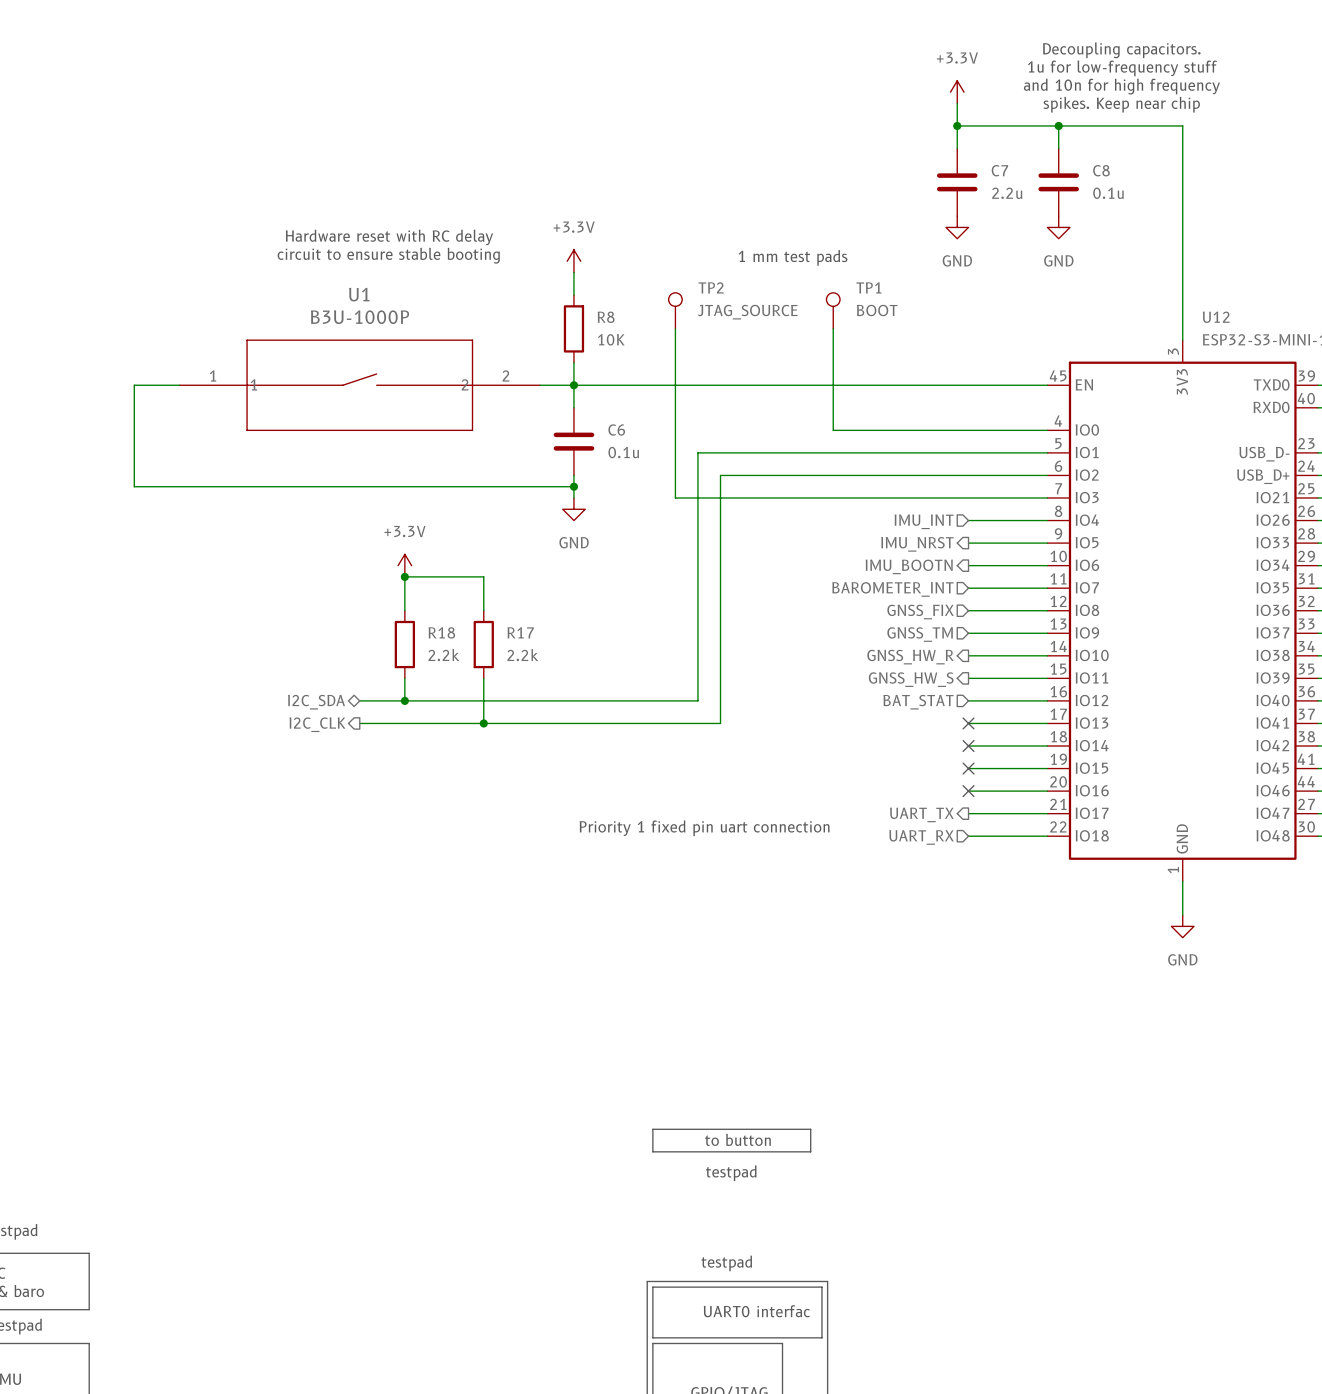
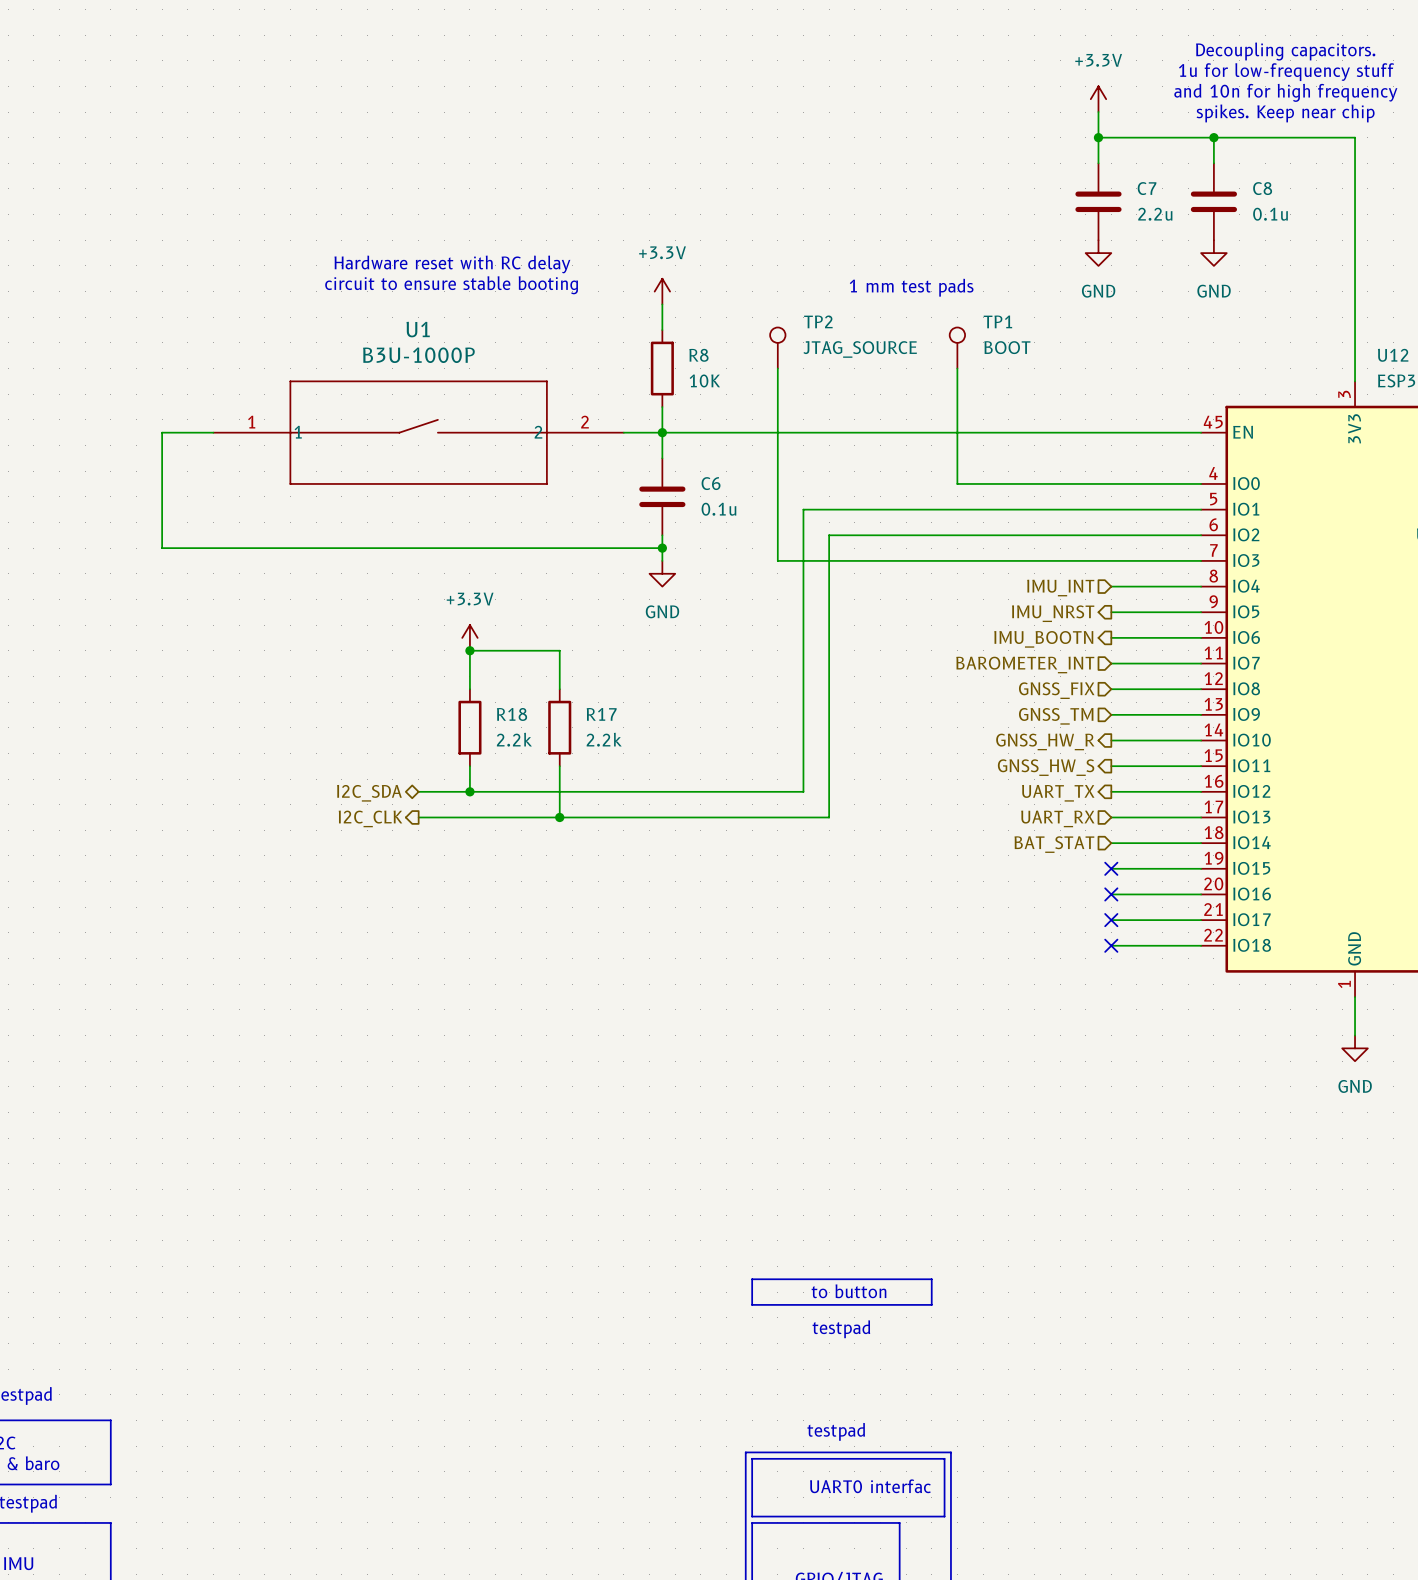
hierarchical label shape: input (918, 702) -> output (1058, 793)
hierarchical label: BAT_STAT (918, 702) -> UART_TX (1058, 793)
no-connect mark: (968, 723) -> none
no-connect mark: (968, 746) -> none
hierarchical label: none -> BAT_STAT (1054, 844)
no-connect mark: none -> (1111, 920)
hierarchical label: UART_TX (921, 814) -> none
text: Priority 1 fixed pin uart connection (704, 828) -> none
no-connect mark: none -> (1111, 945)
hierarchical label position: UART_RX (921, 837) -> UART_RX (1057, 818)

